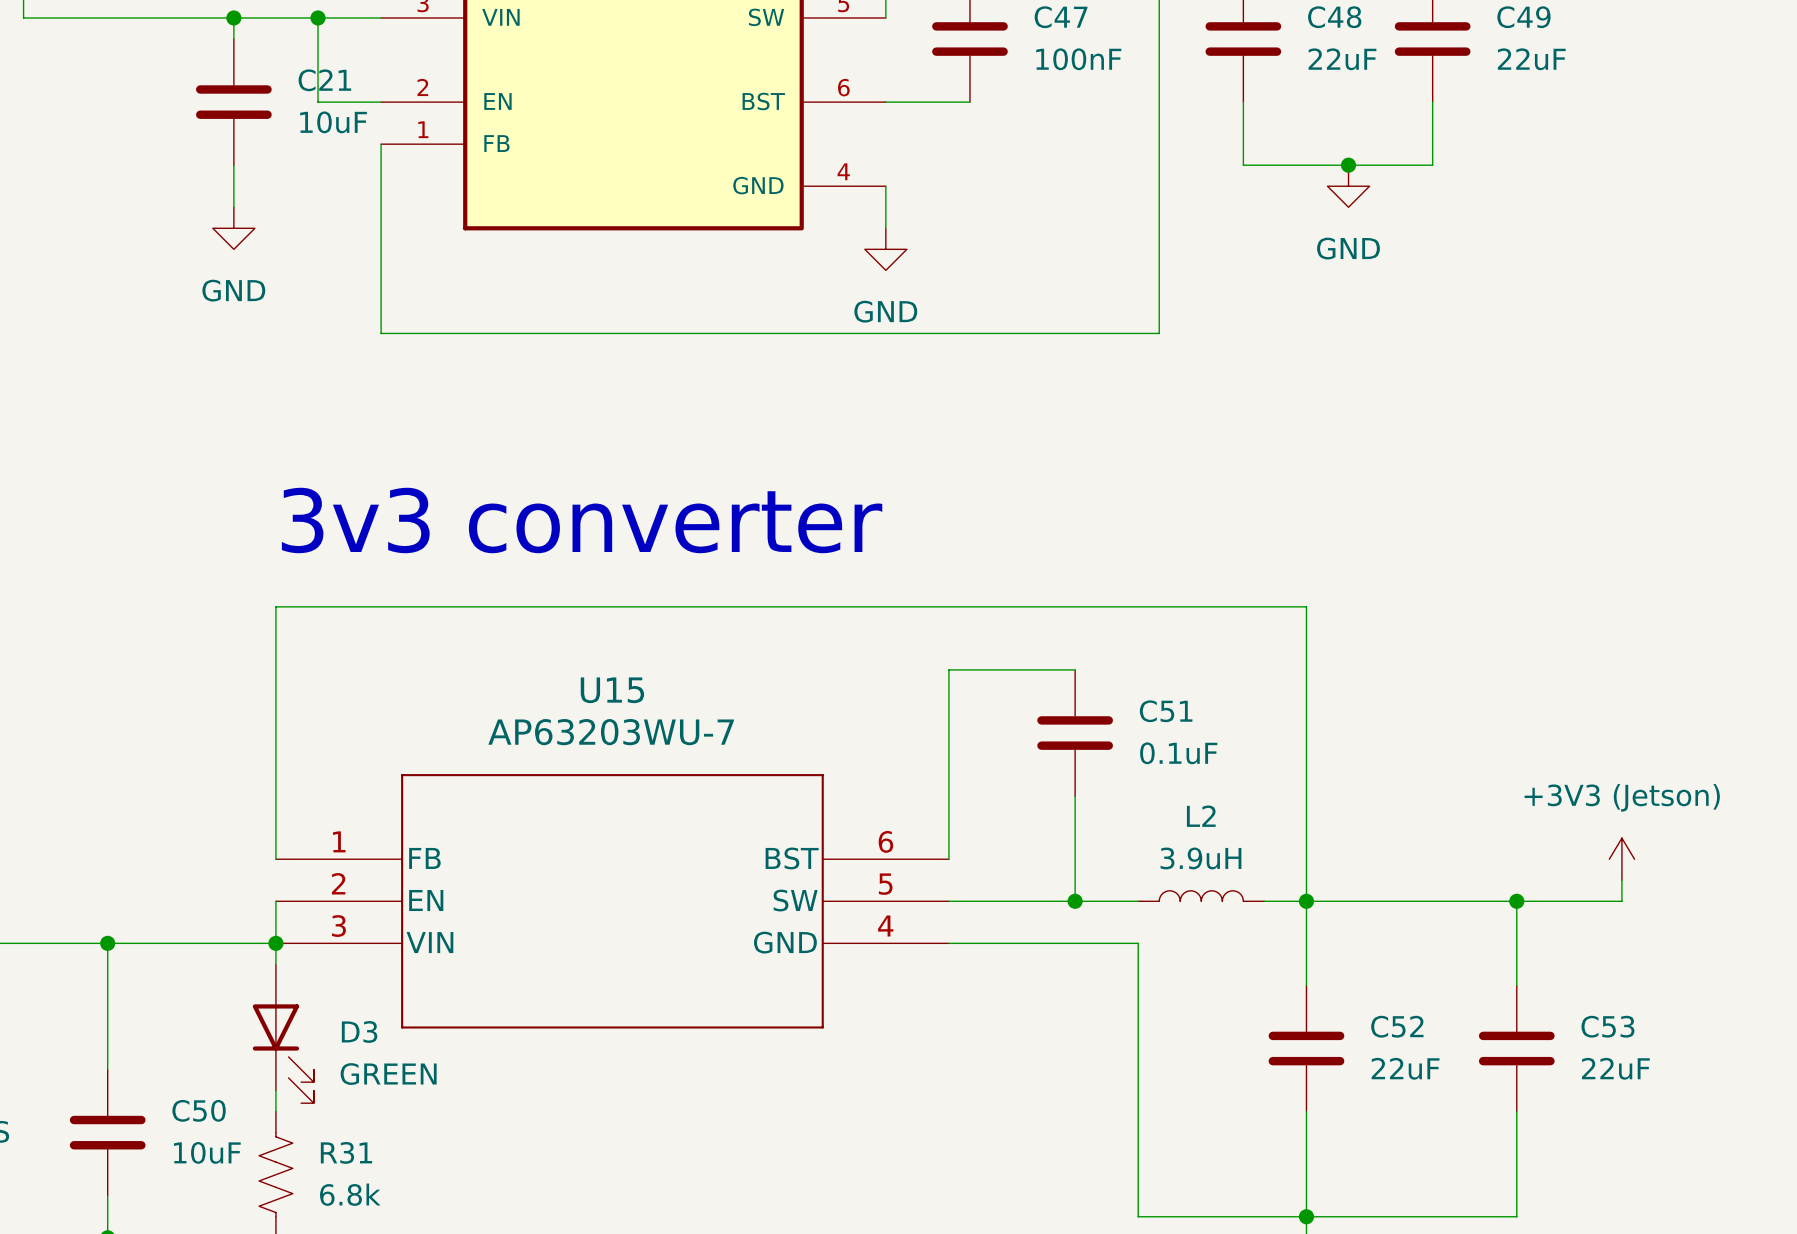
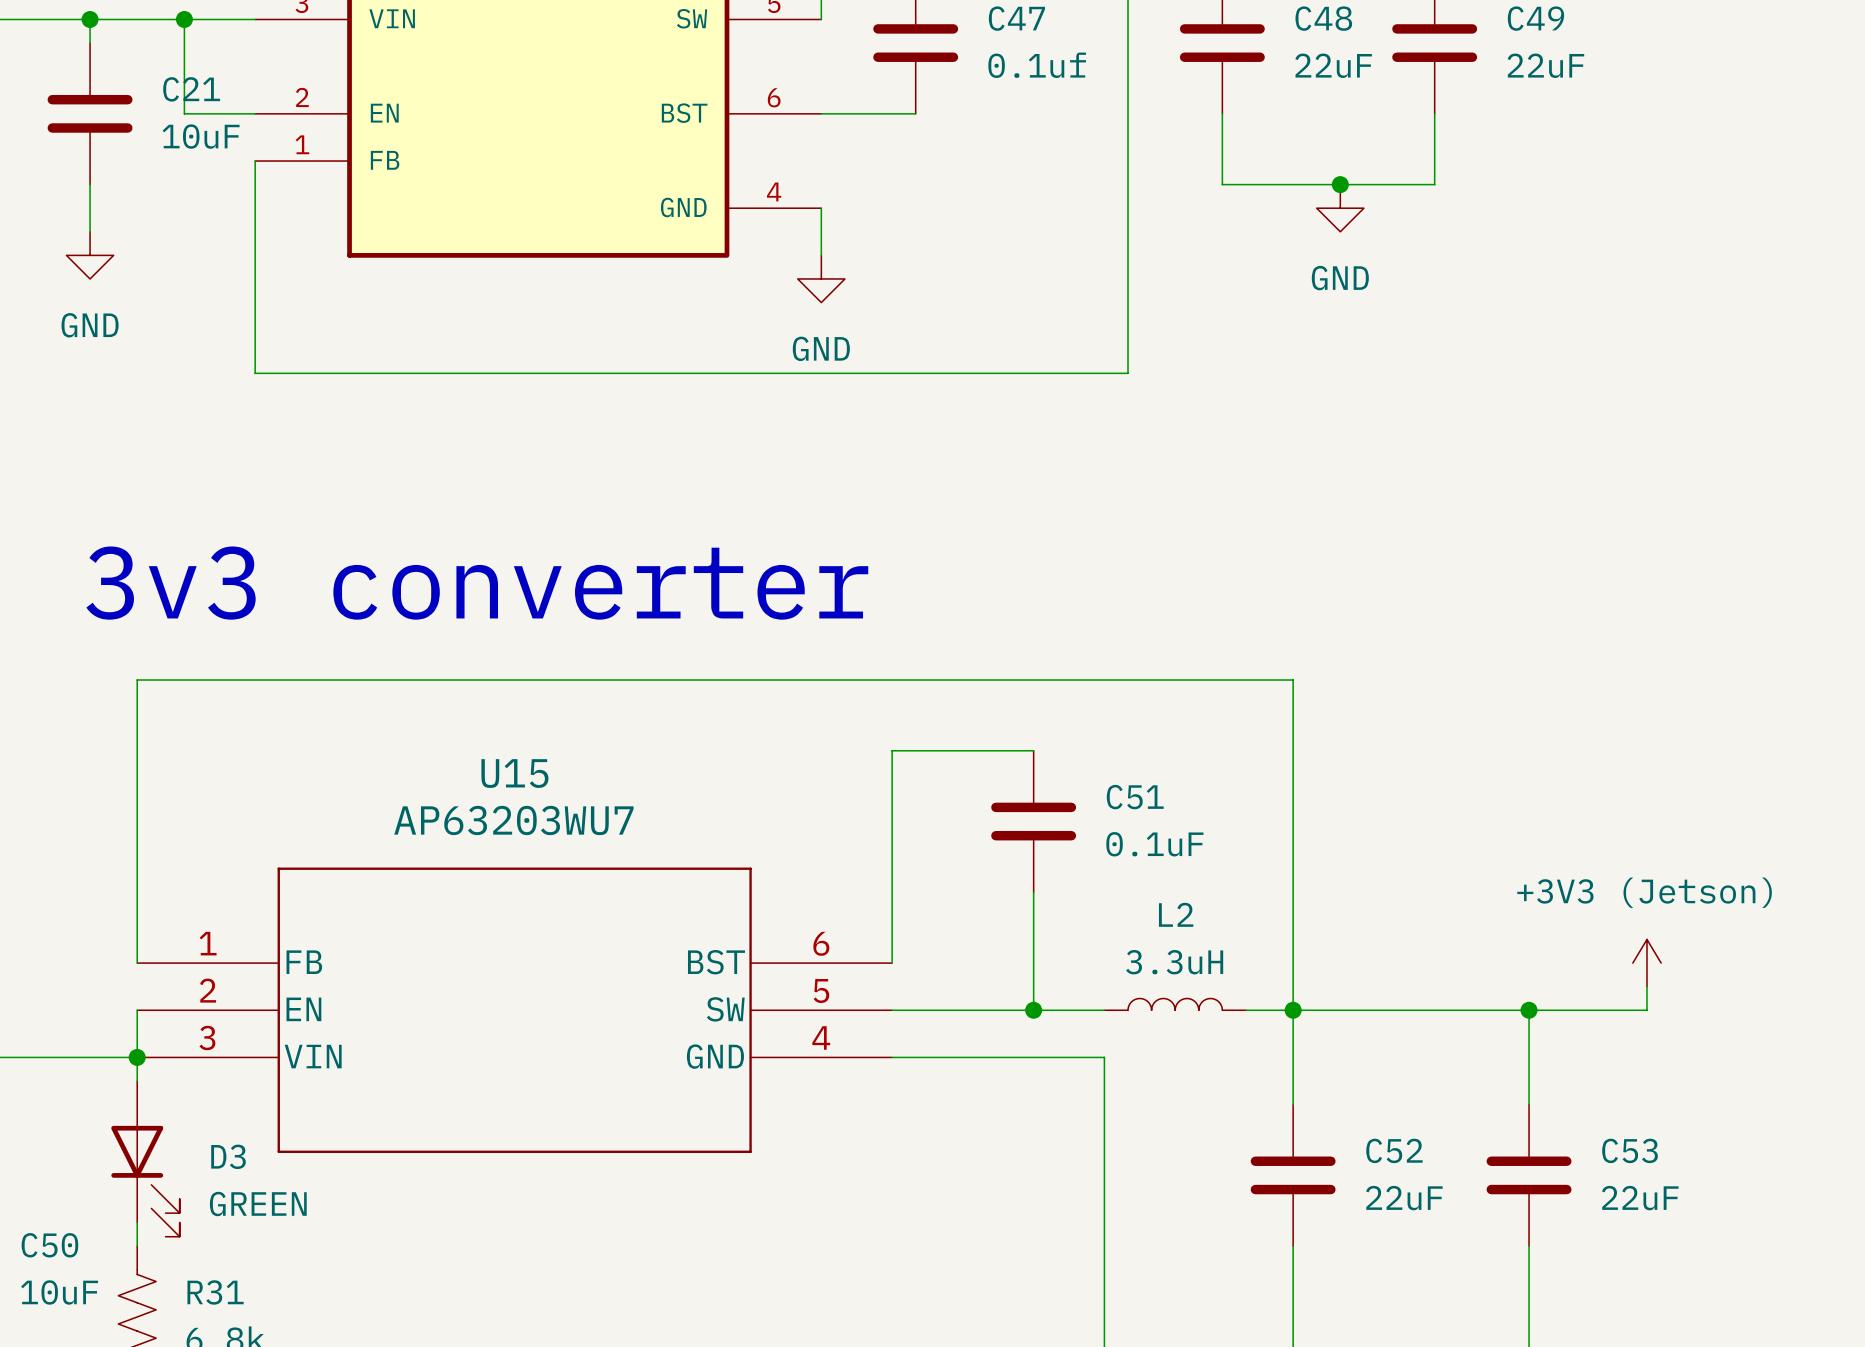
C47 value: 100nF (1078, 59) -> 0.1uf (1037, 65)
U15 value: AP63203WU-7 (611, 732) -> AP63203WU7 (513, 820)
L2 value: 3.9uH (1200, 858) -> 3.3uH (1174, 962)

